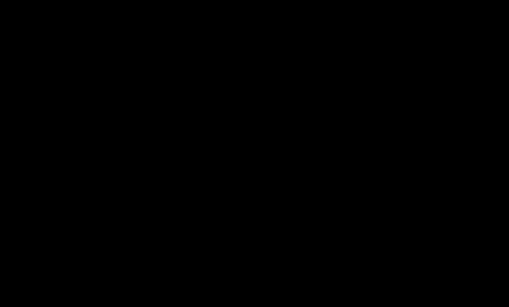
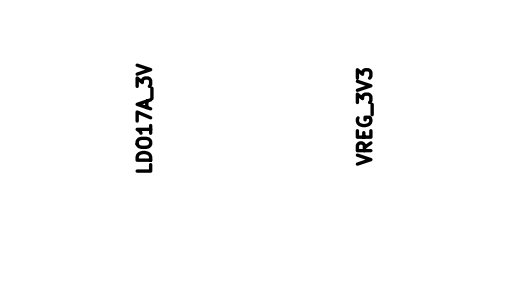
text: none -> VREG_3V3 (364, 116)
text: none -> LDO17A_3V (144, 118)

